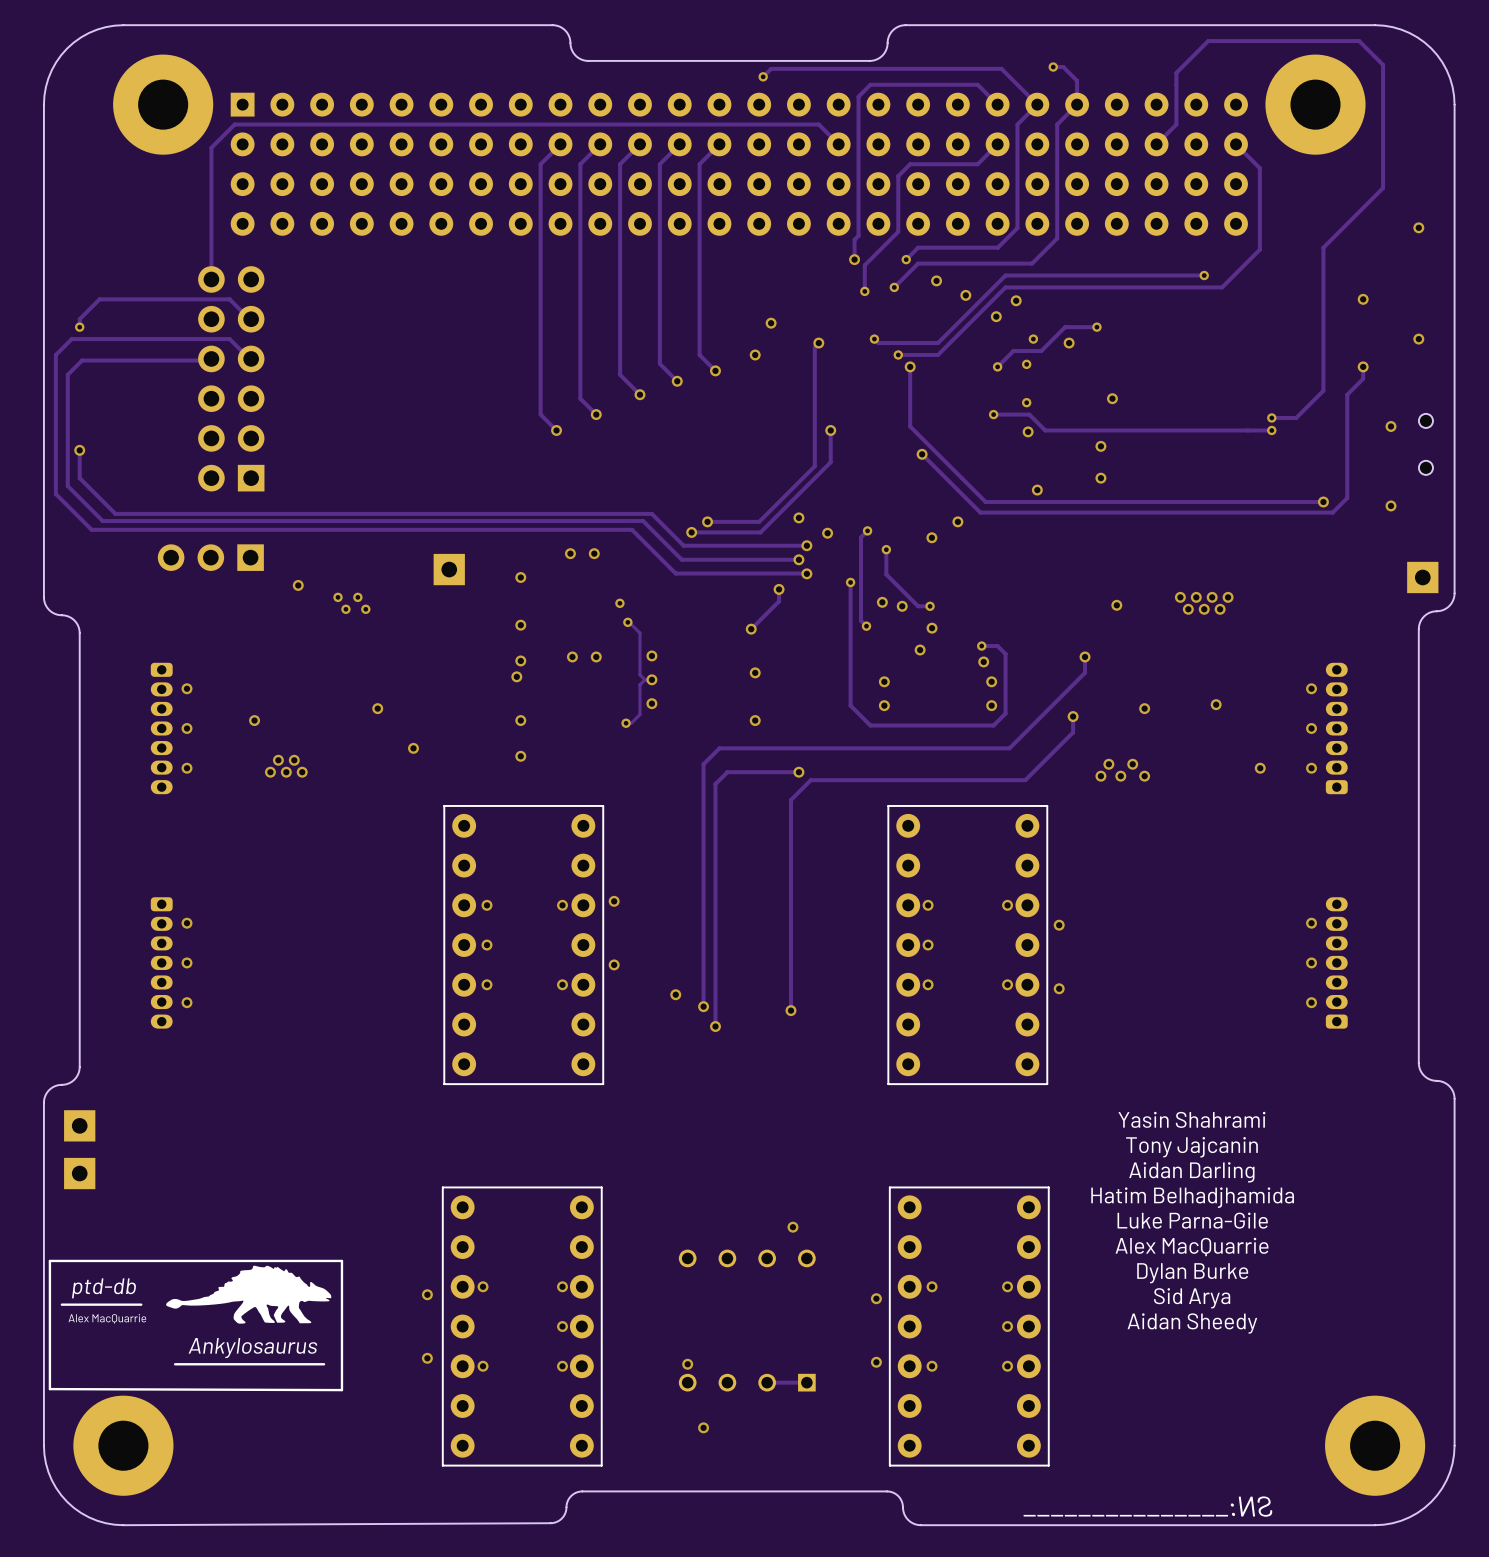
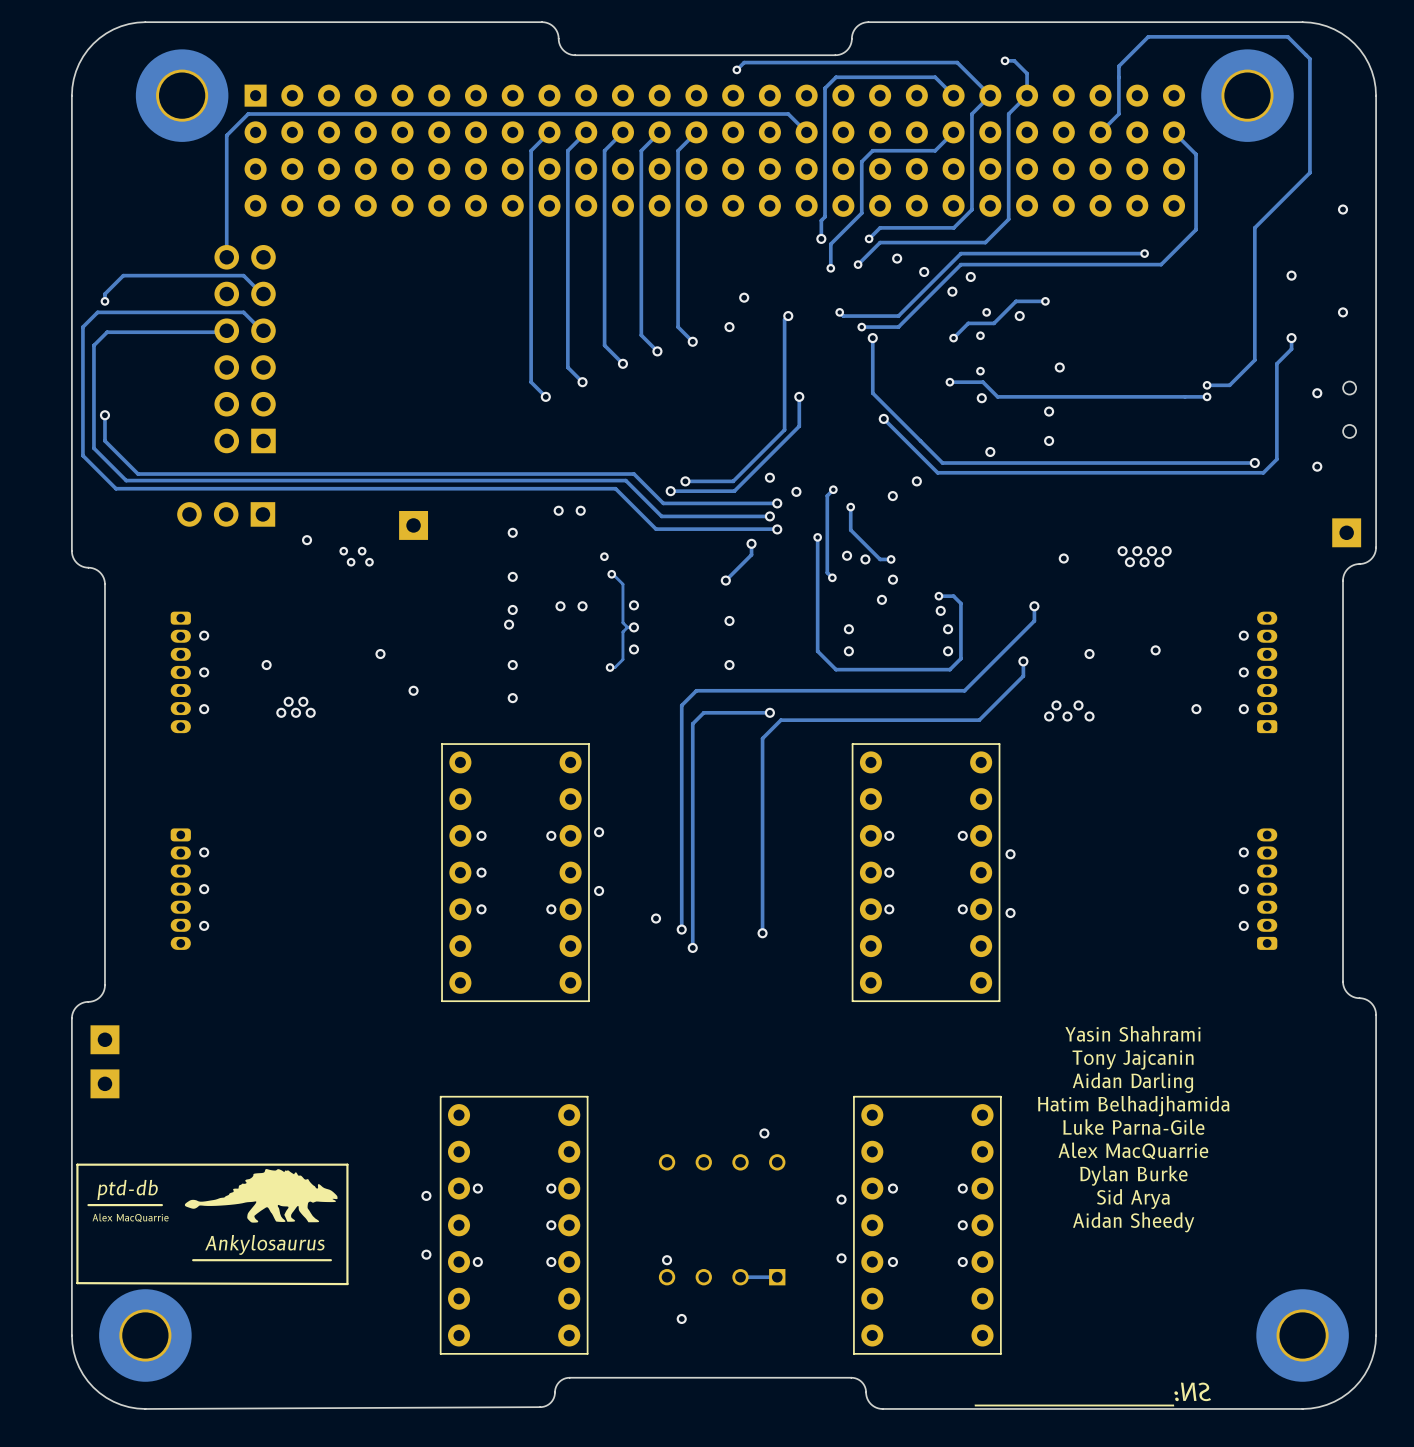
part position: (449, 569) -> (413, 525)

